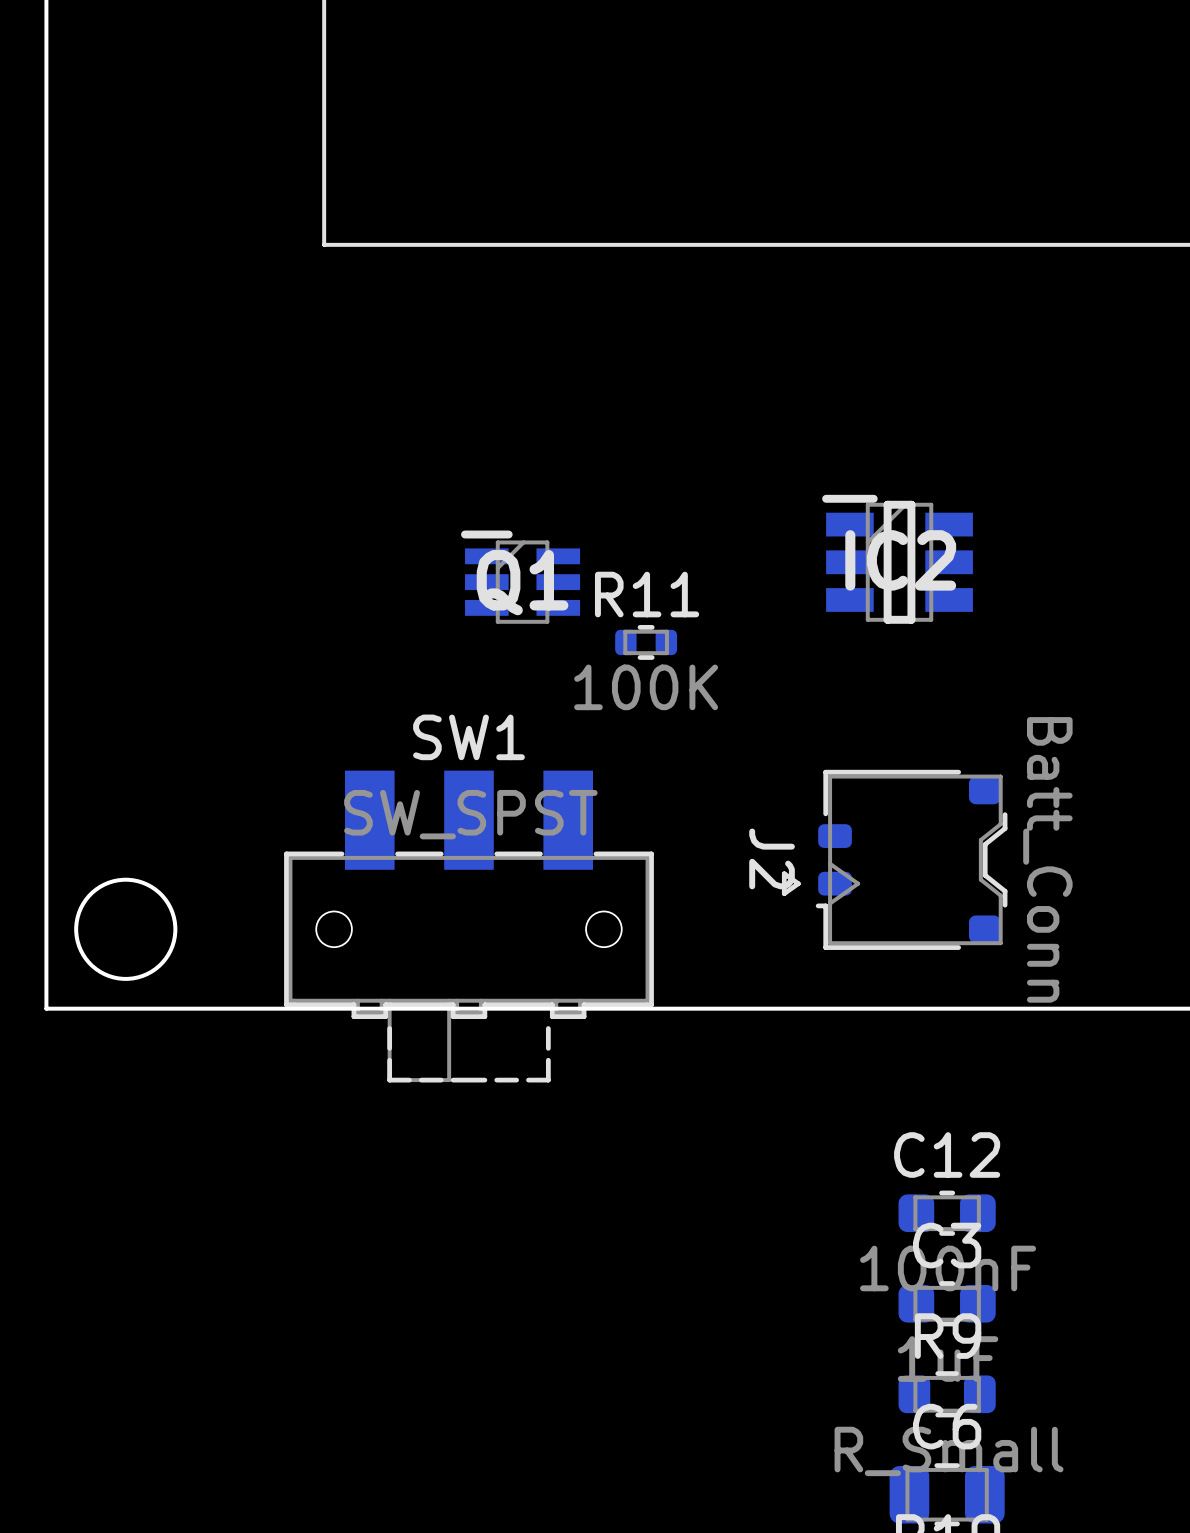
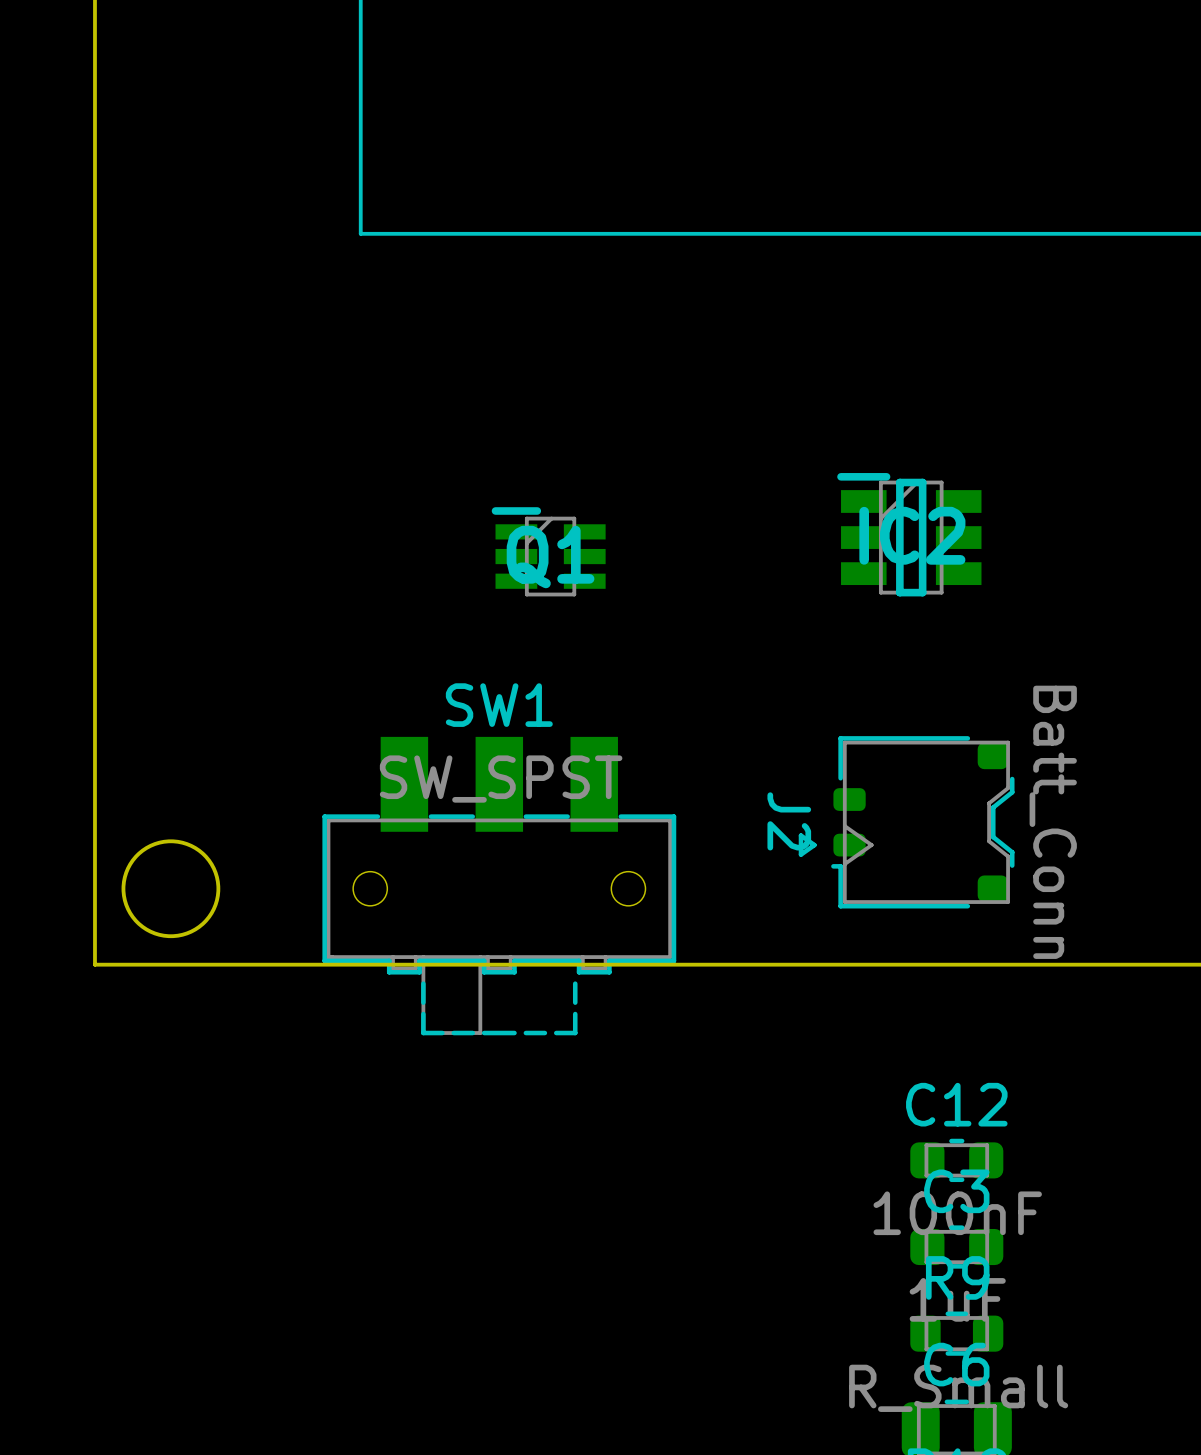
R11: 100K (646, 642) -> none

